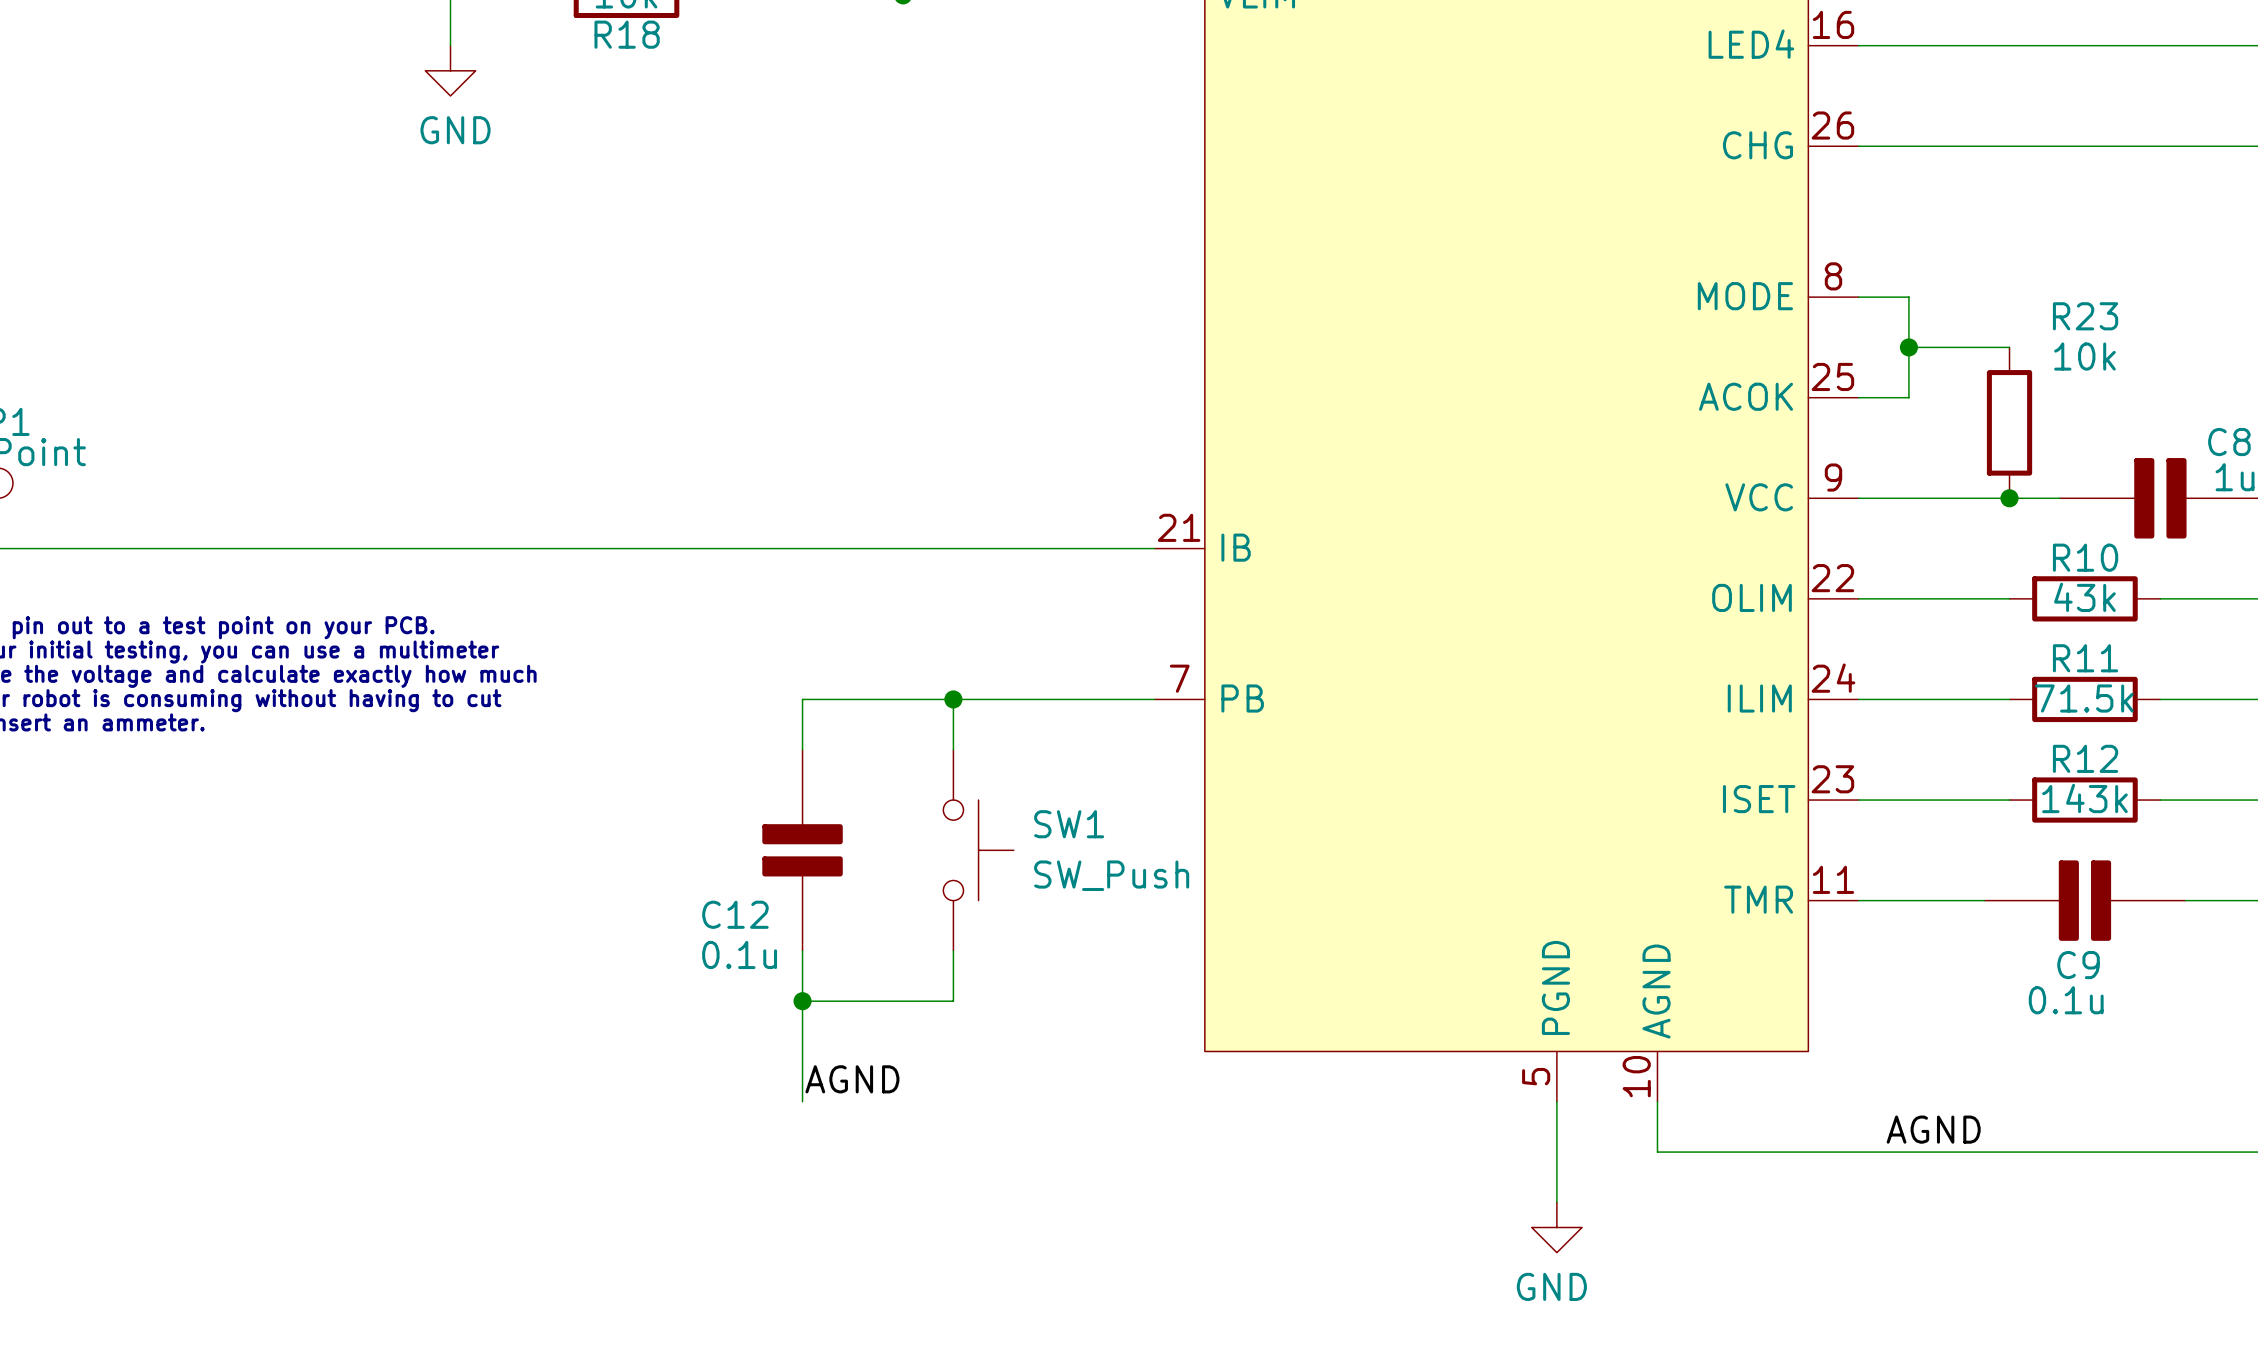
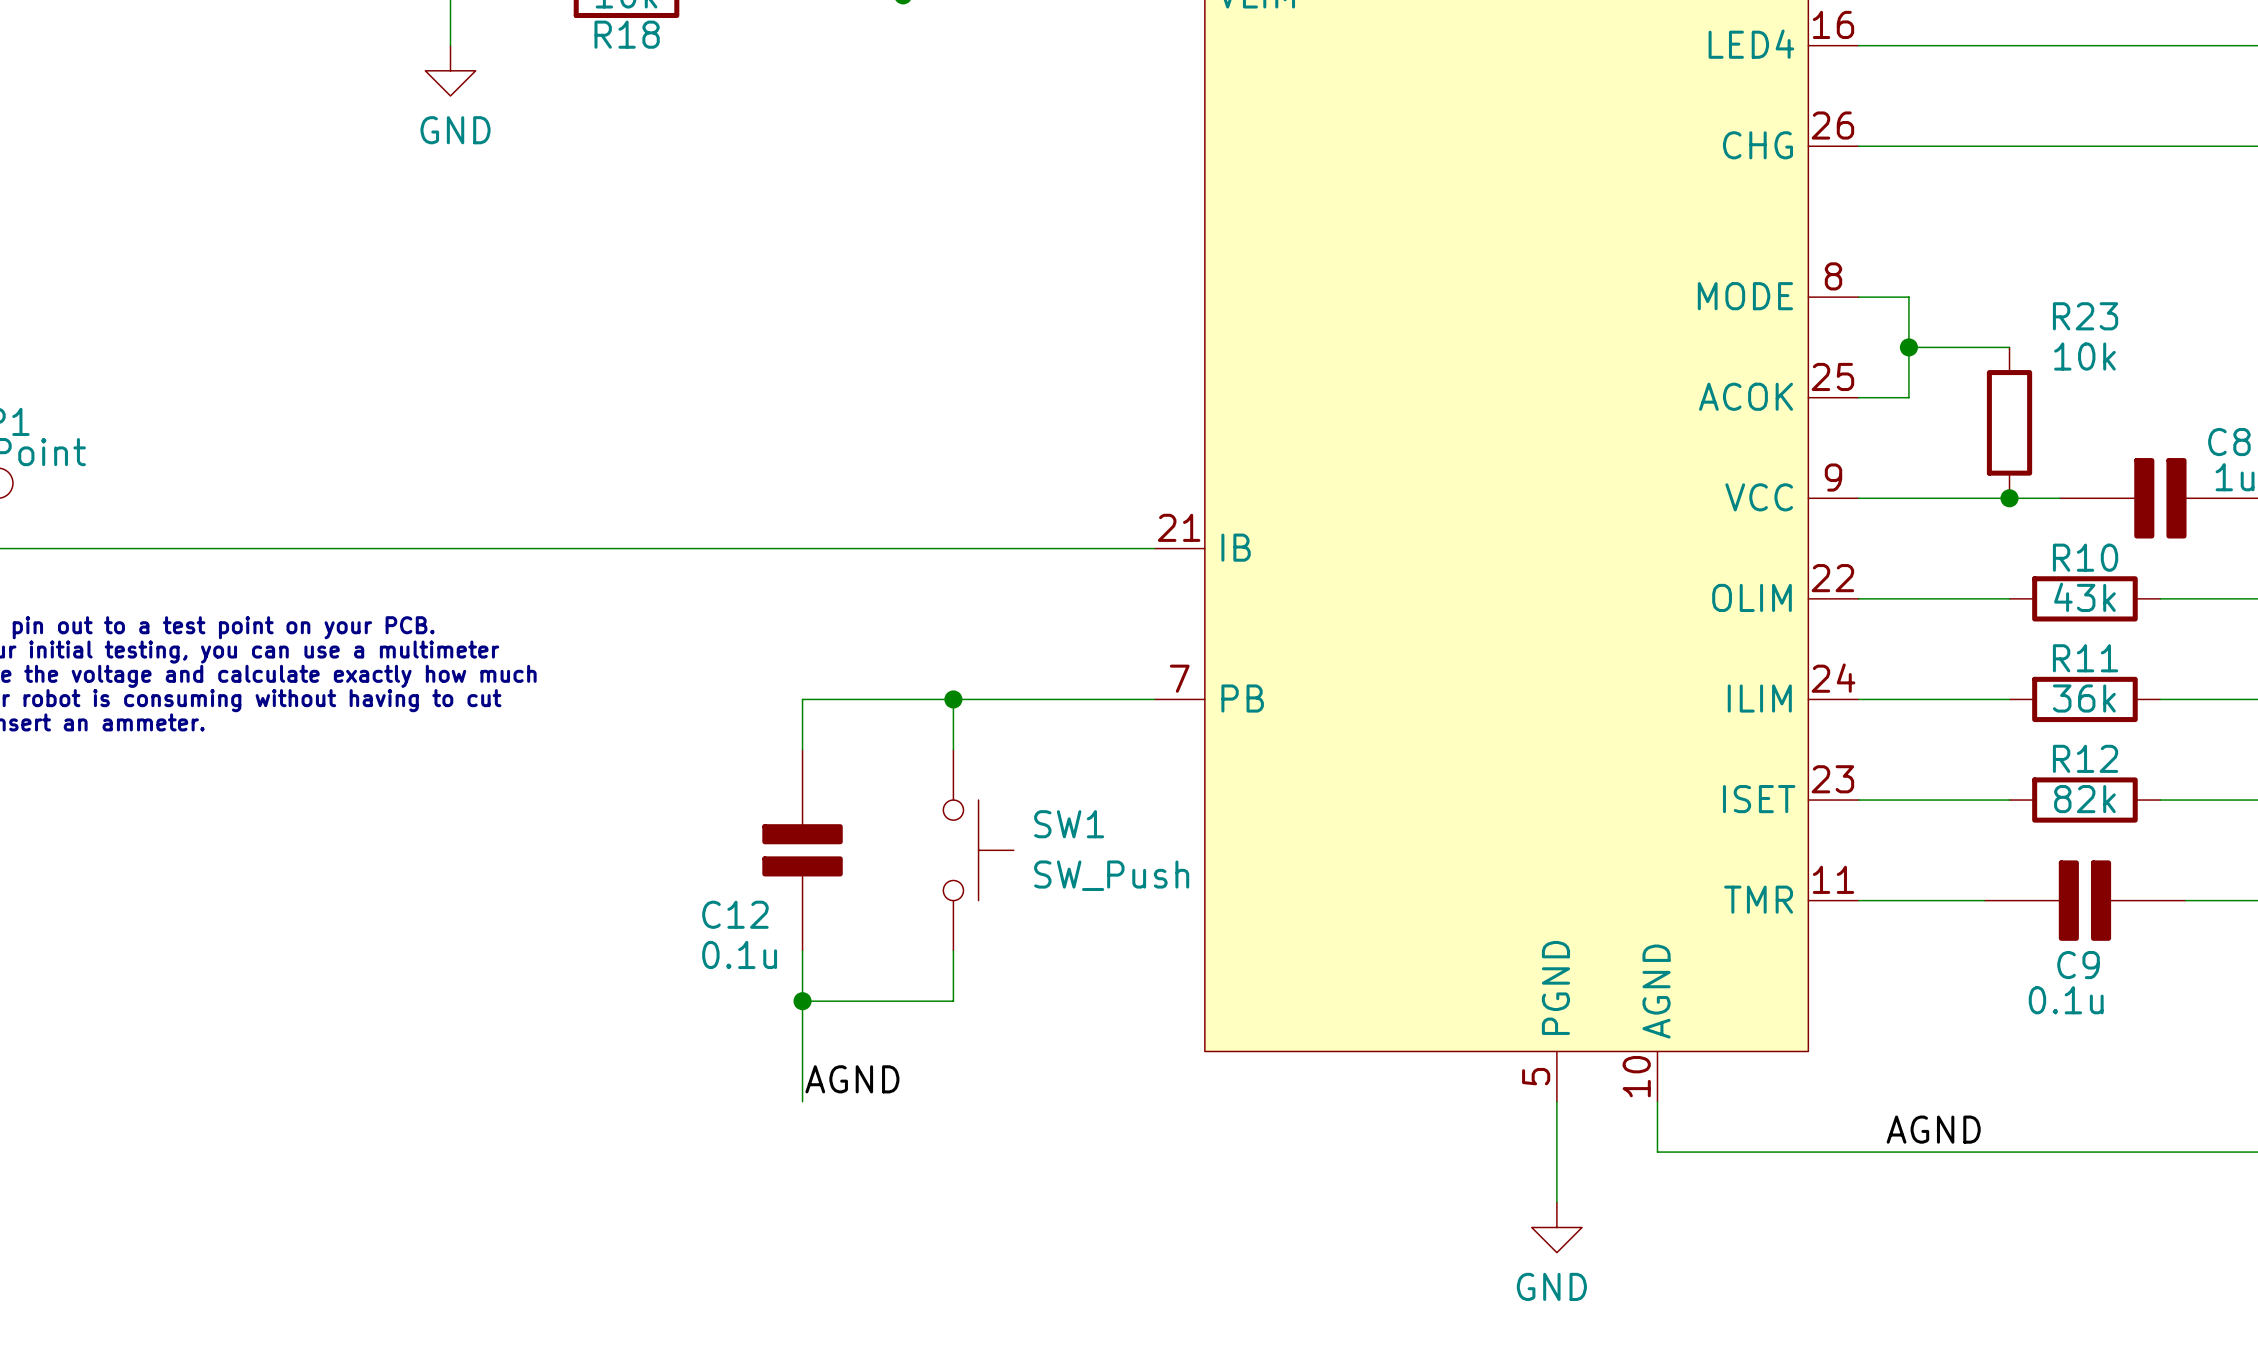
R11 value: 71.5k (2084, 698) -> 36k (2084, 698)
R12 value: 143k (2084, 798) -> 82k (2084, 799)

